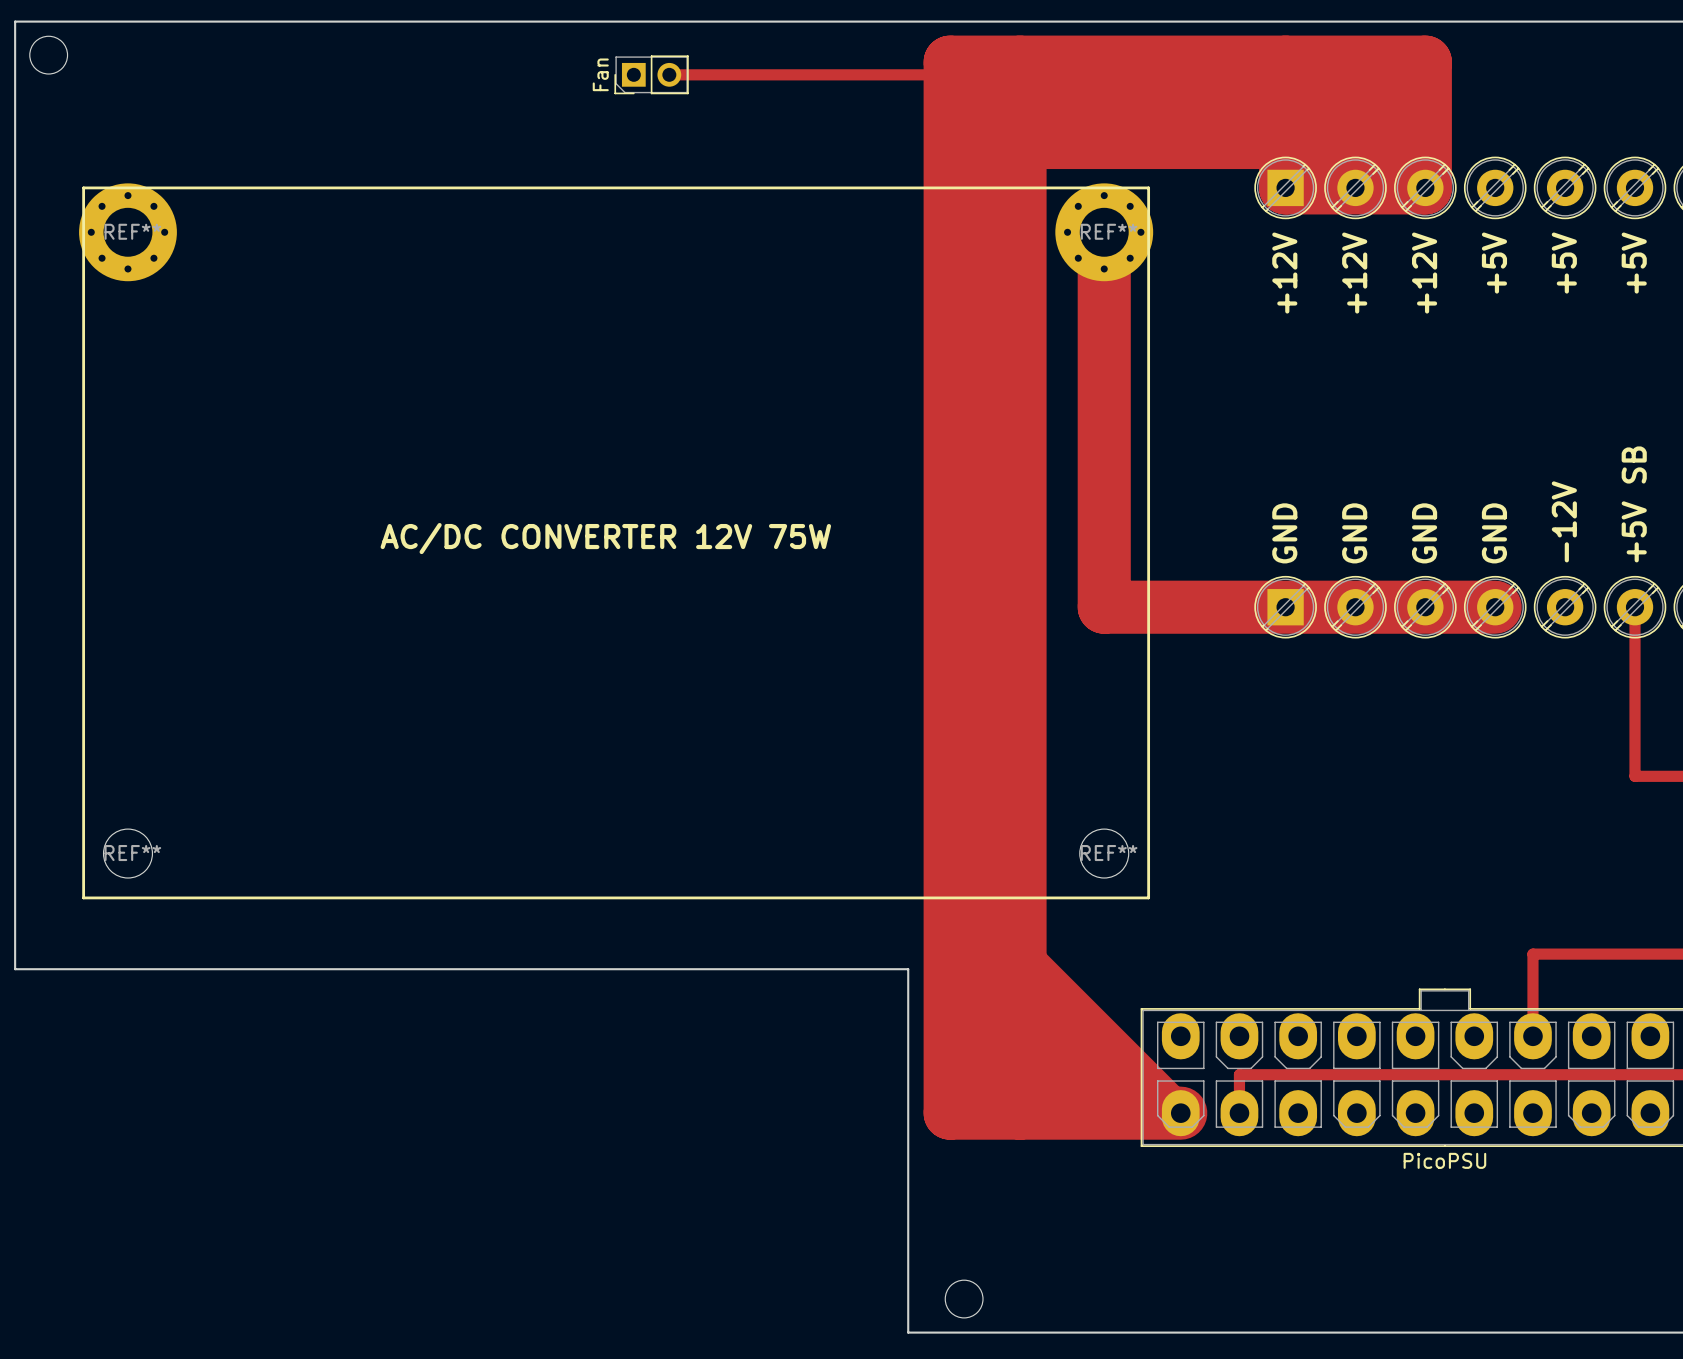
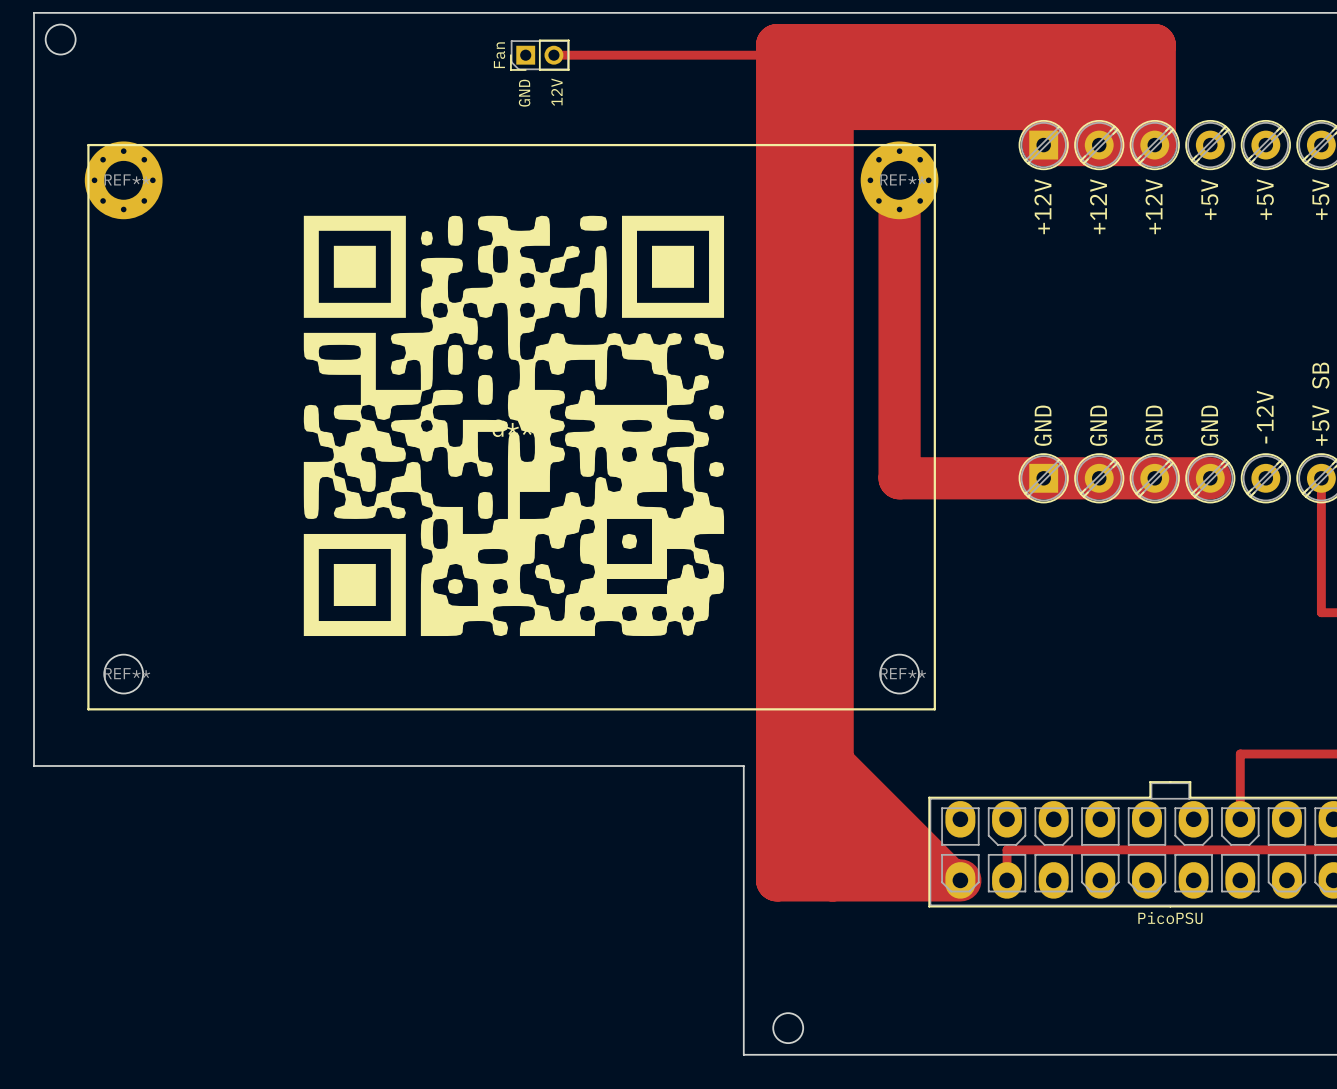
text: none -> 12V (556, 92)
text: none -> GND (524, 93)
text: AC/DC CONVERTER 12V 75W (605, 538) -> none
part: none -> (513, 425)

